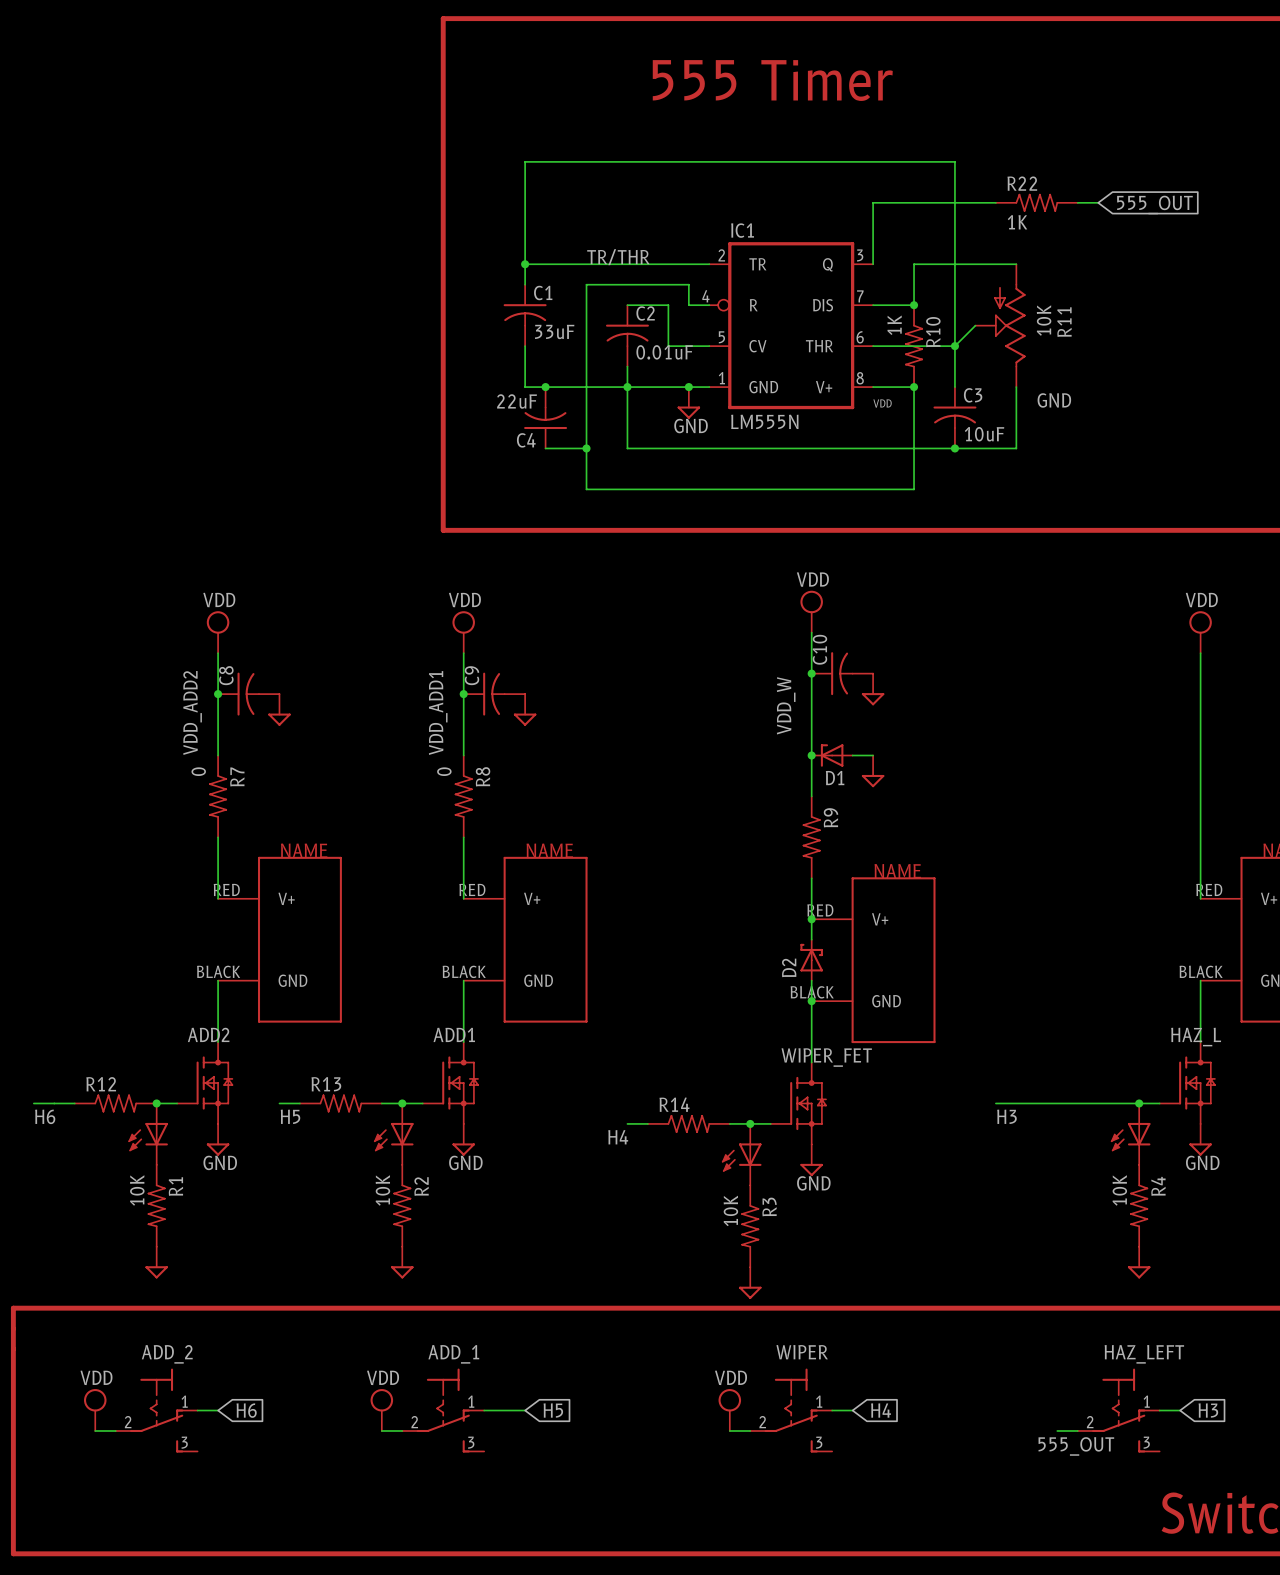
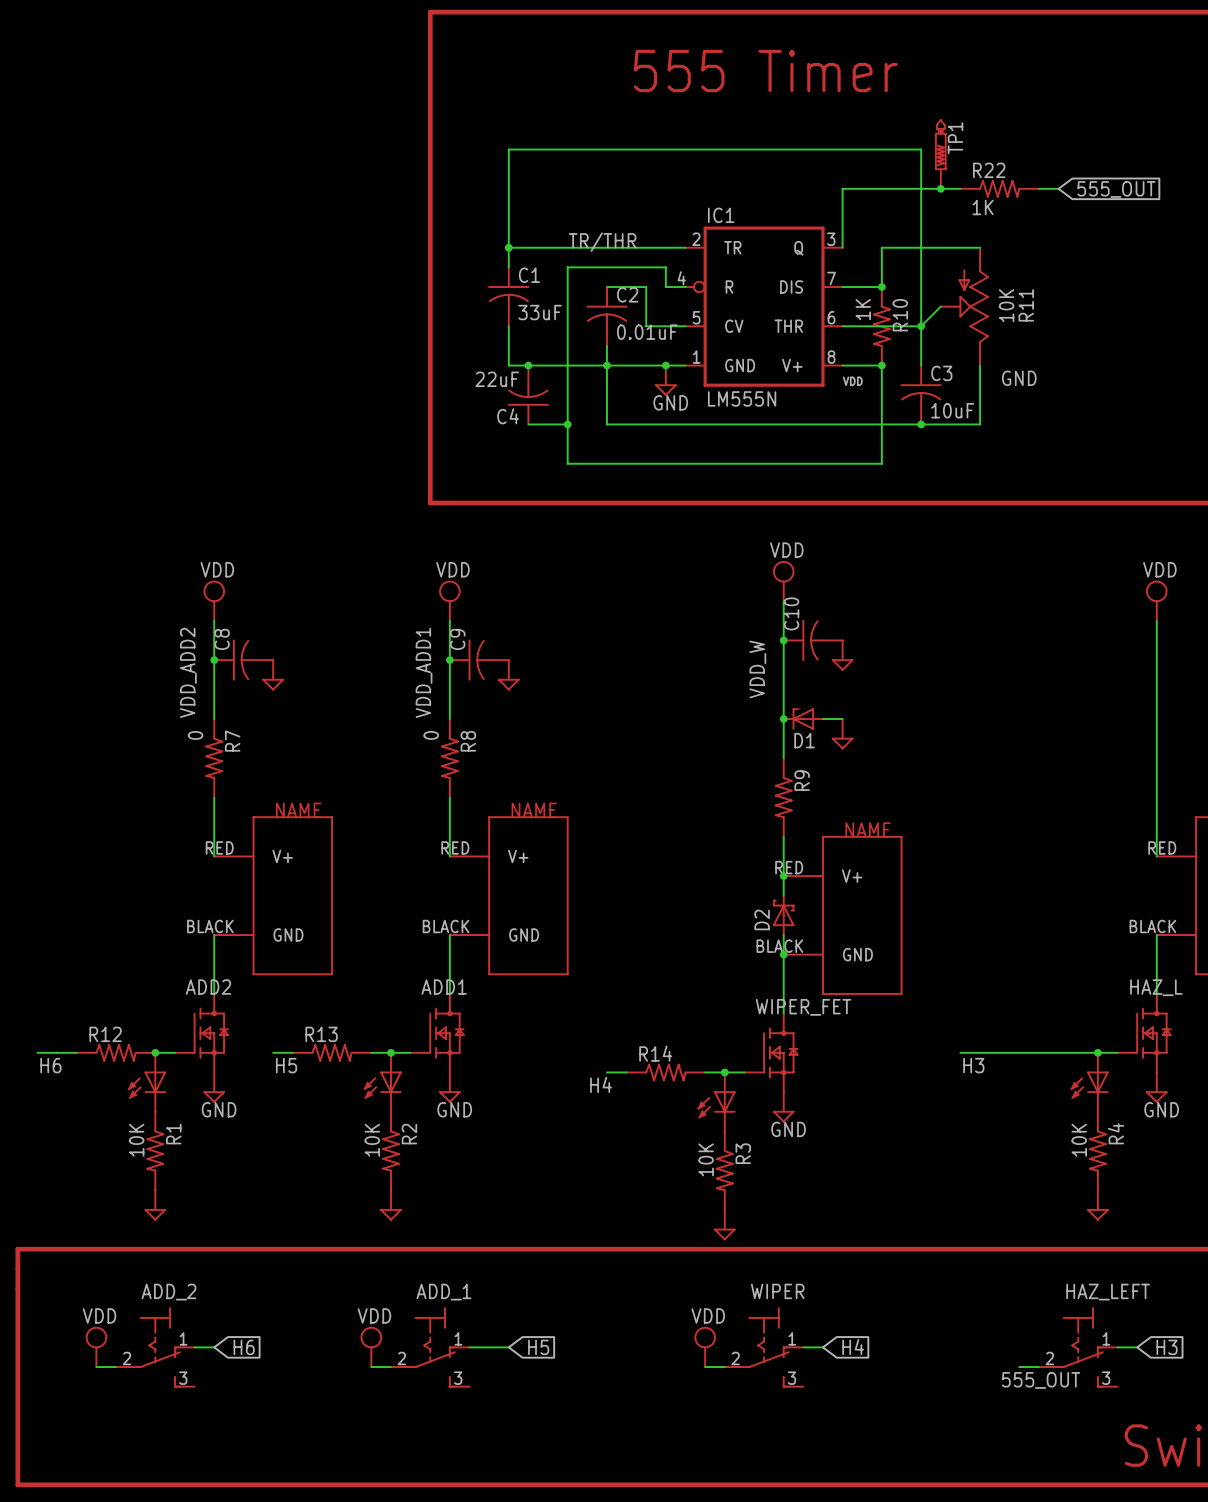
TP1: none -> (940, 154)
junction: none -> (940, 188)

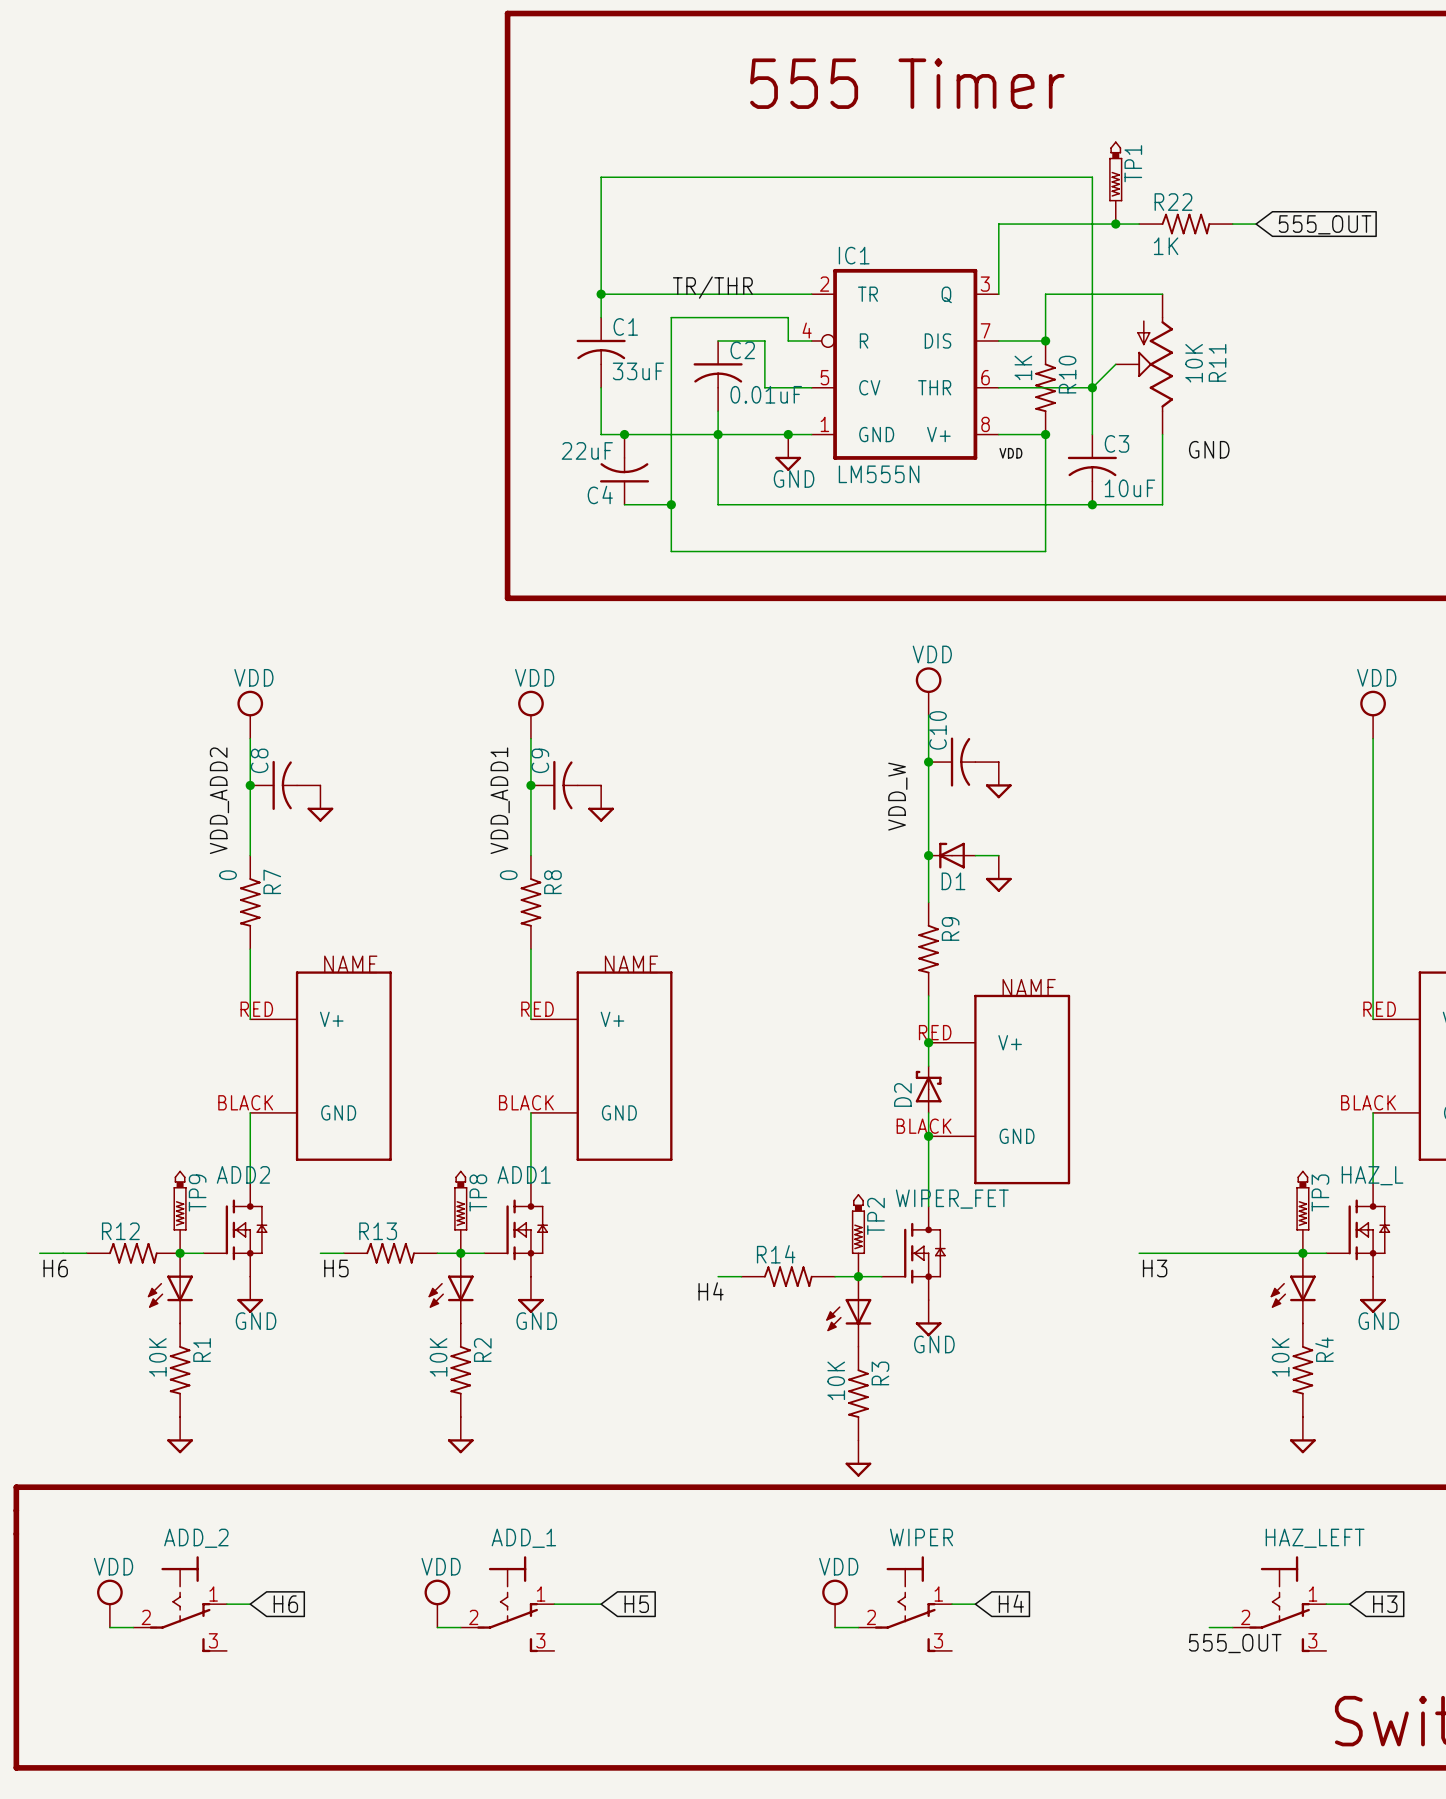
TP9: none -> (180, 1211)
TP8: none -> (460, 1211)
TP3: none -> (1302, 1211)
TP2: none -> (858, 1235)

